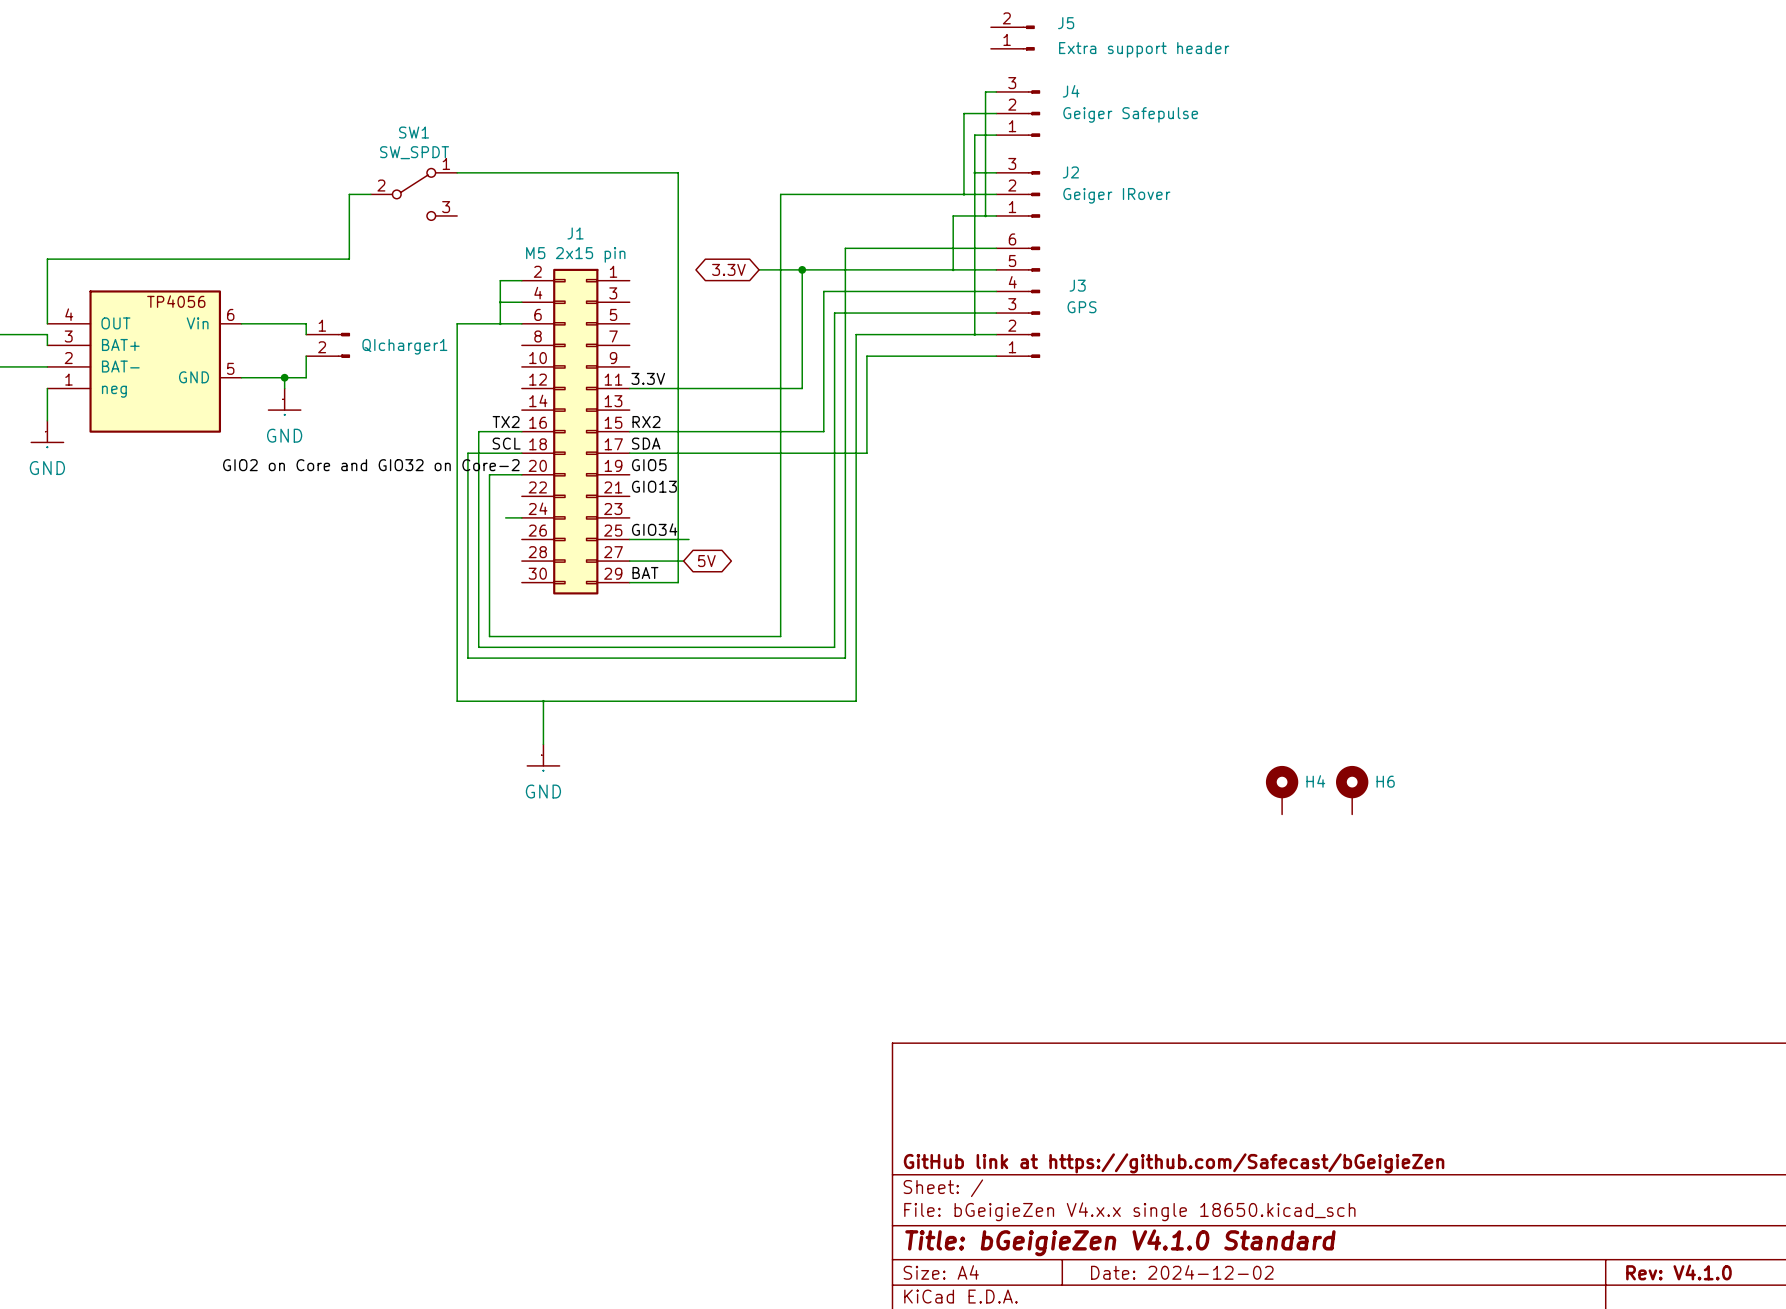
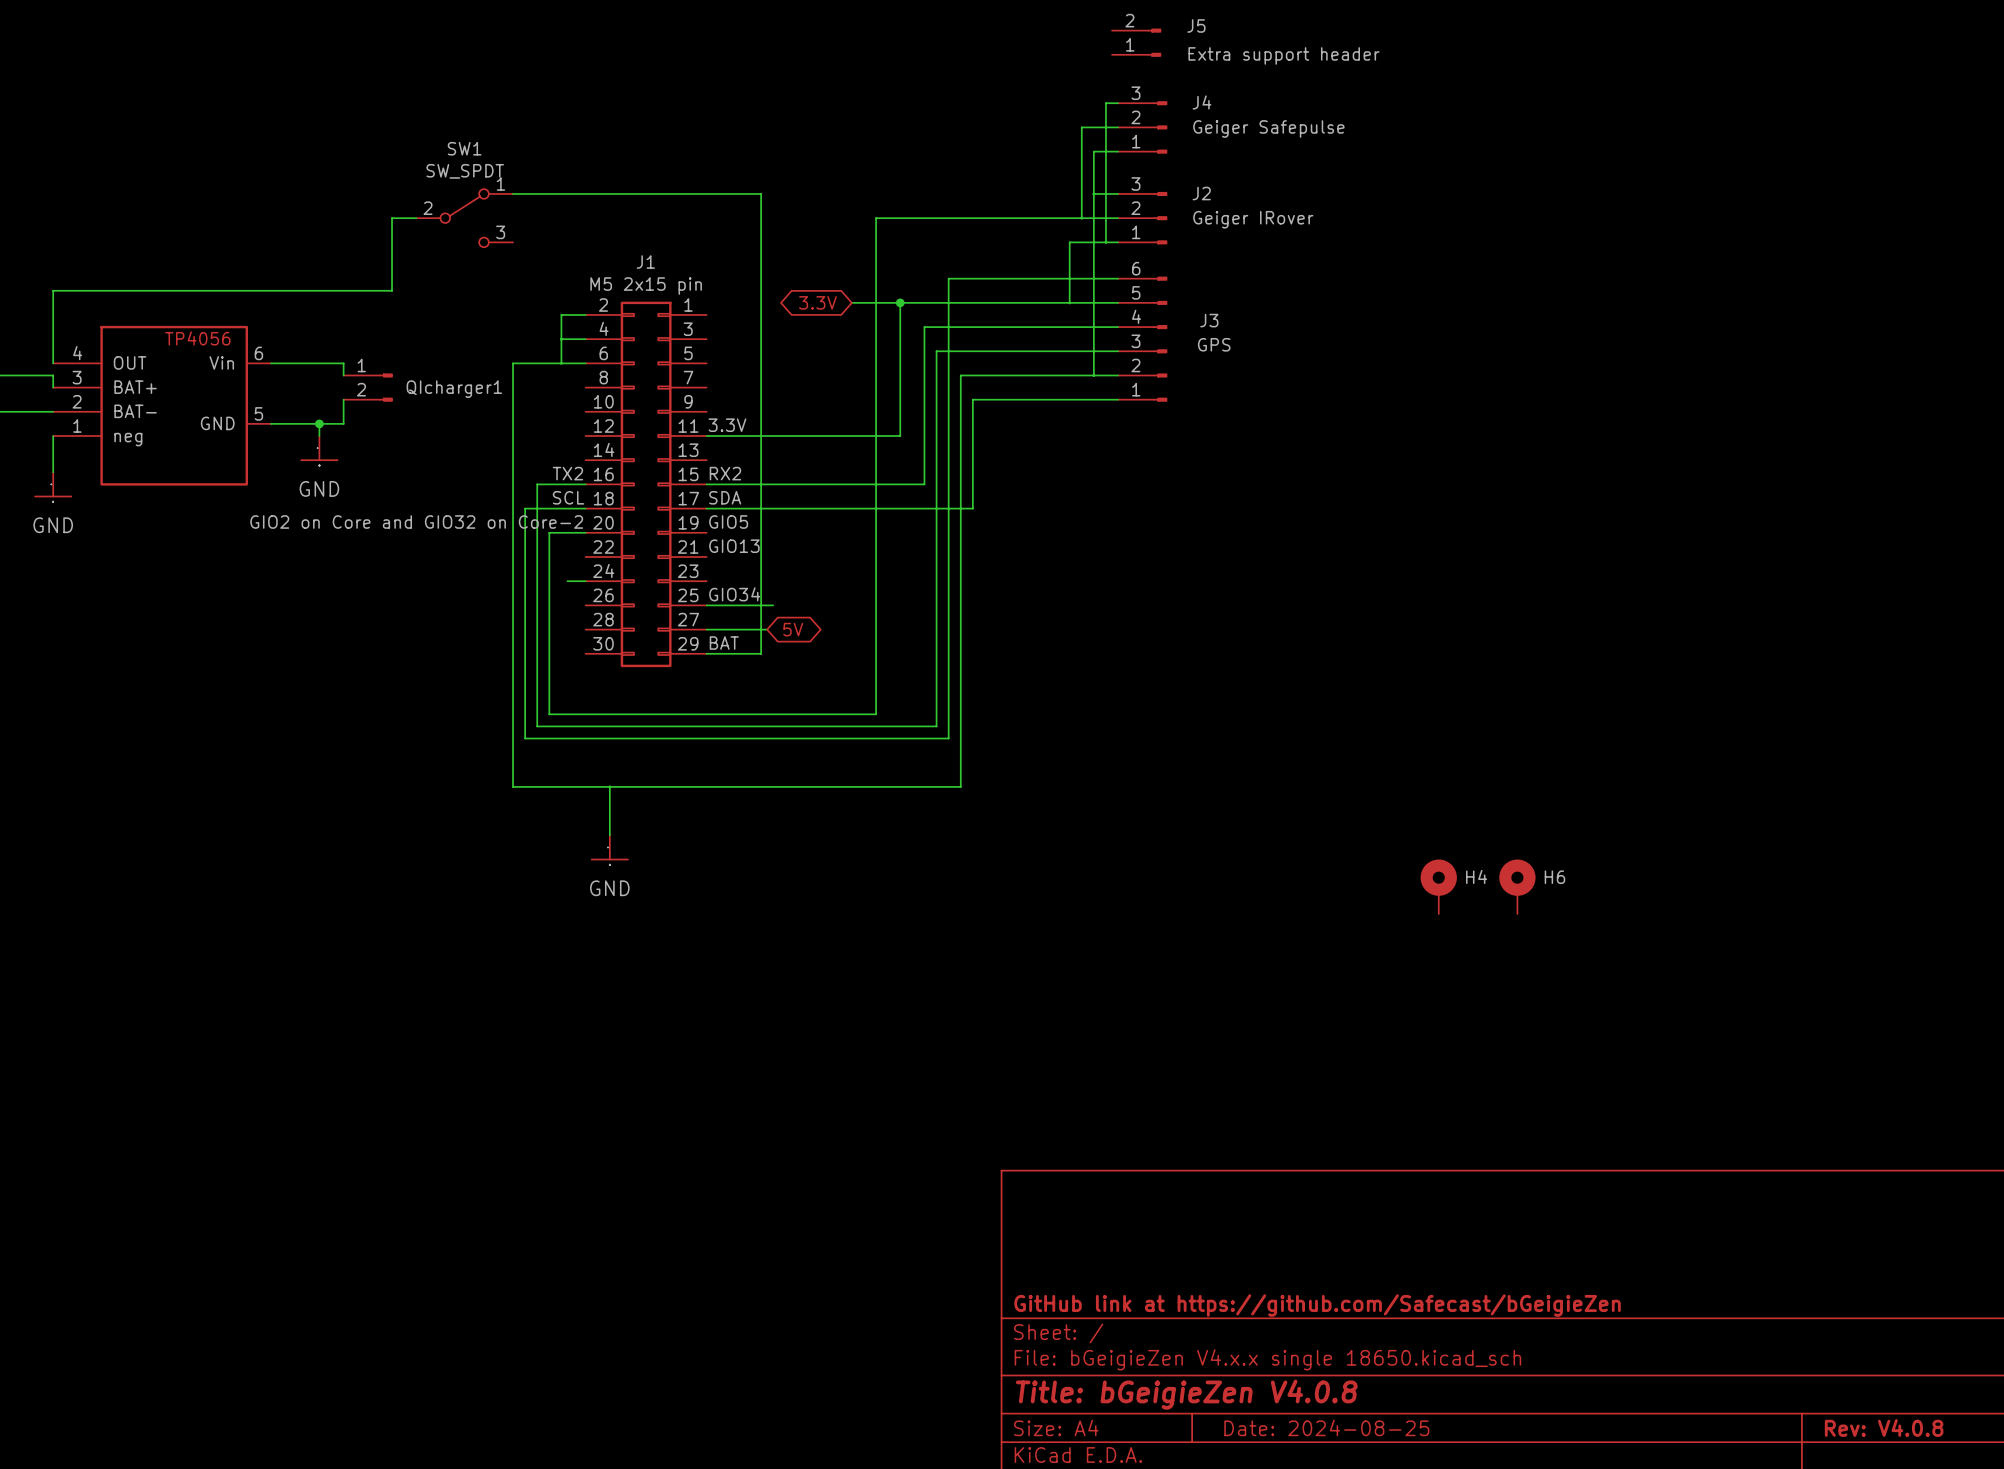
title block: Title: bGeigieZen V4.1.0 Standard (1120, 1242) -> Title: bGeigieZen V4.0.8 (1186, 1394)
title block: Date: 2024-12-02 (1182, 1272) -> Date: 2024-08-25 (1326, 1427)
title block: Rev: V4.1.0 (1678, 1272) -> Rev: V4.0.8 (1884, 1427)

